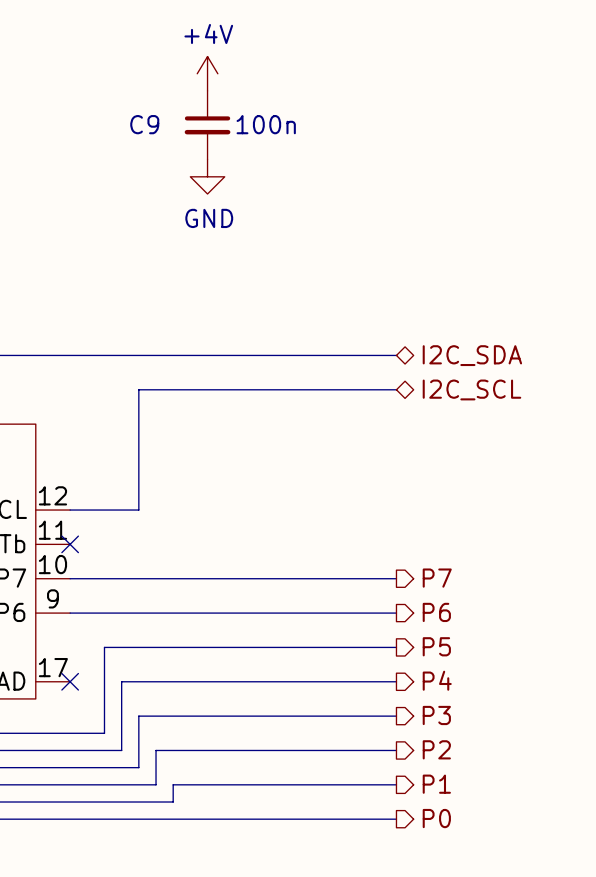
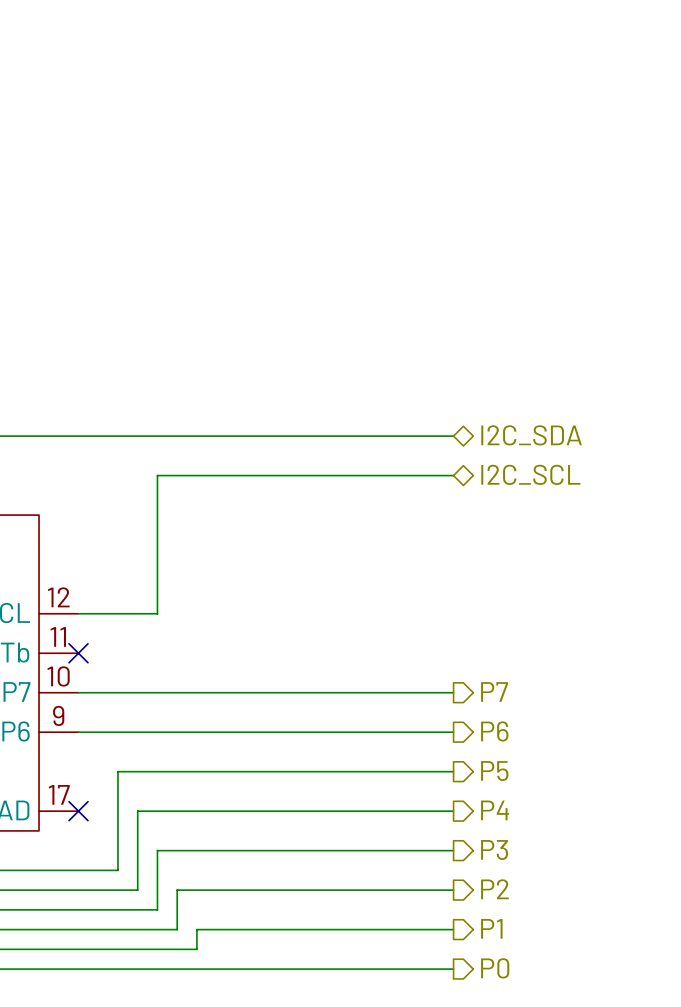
power symbol: +4V (207, 73) -> none
C9: 100n (207, 125) -> none
power symbol: GND (207, 176) -> none

